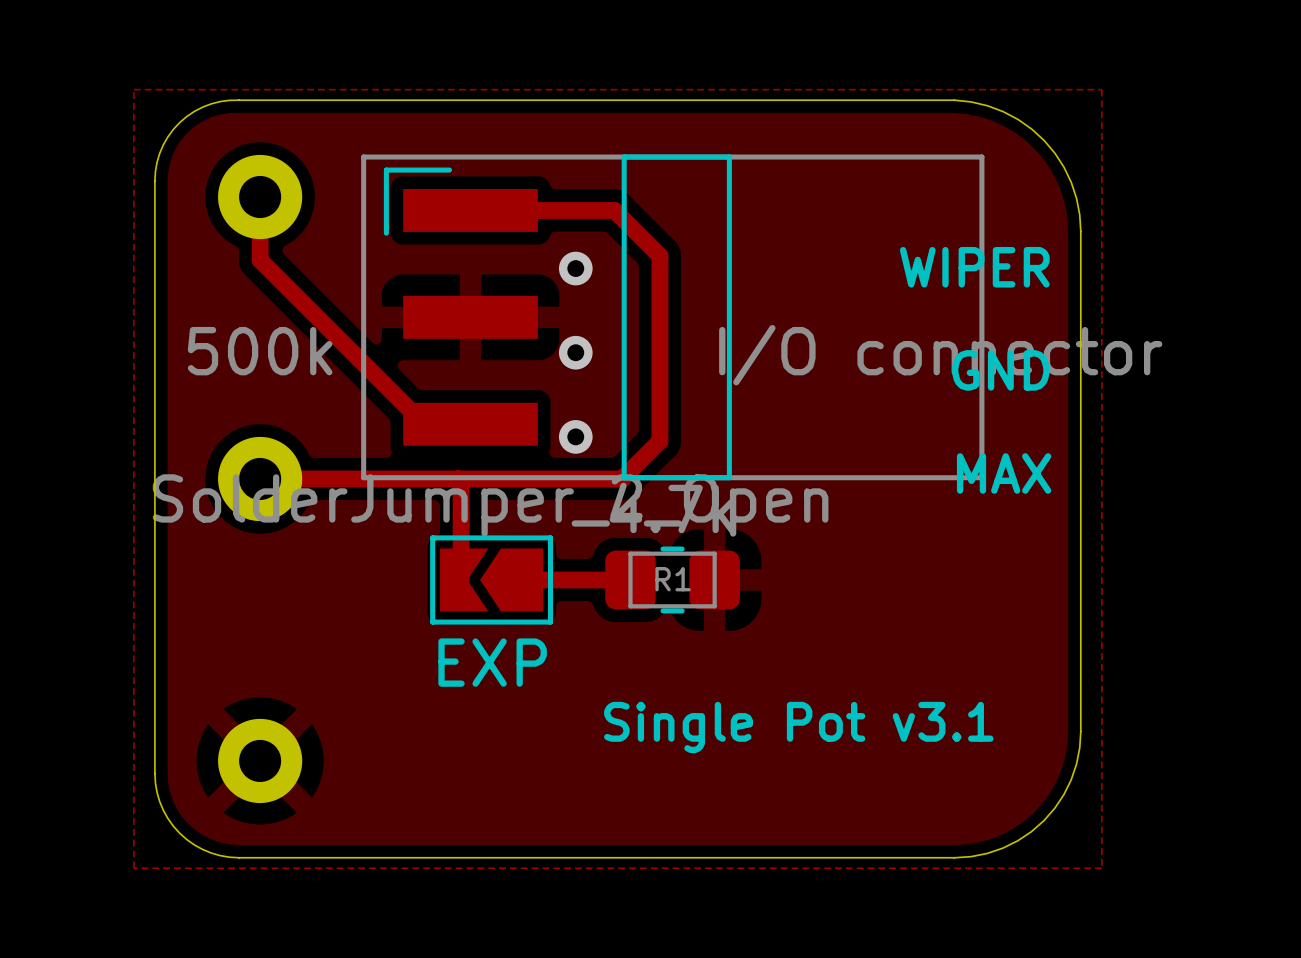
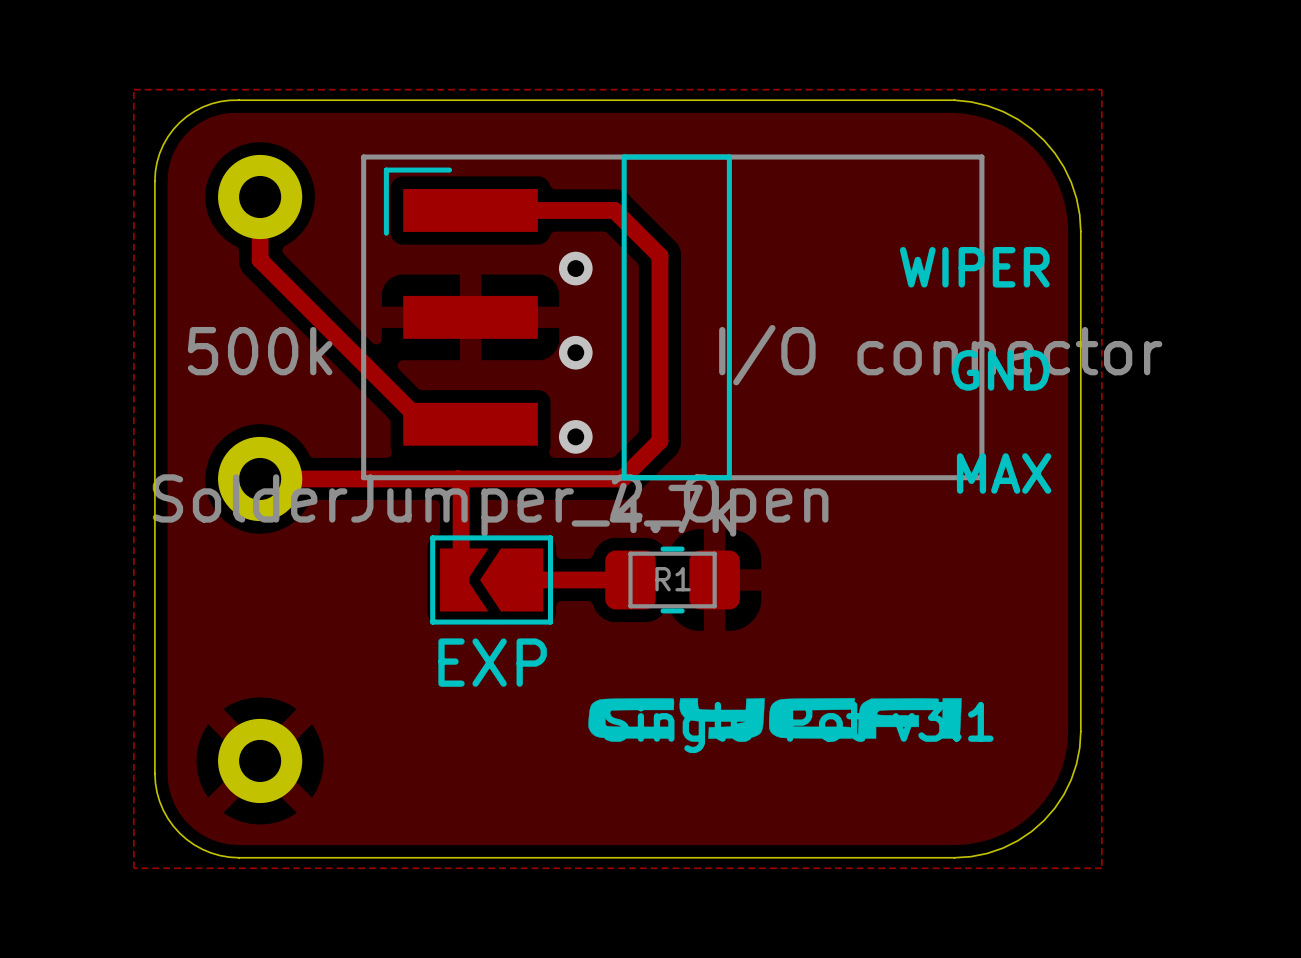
drawing: none -> [588, 698, 962, 739]

